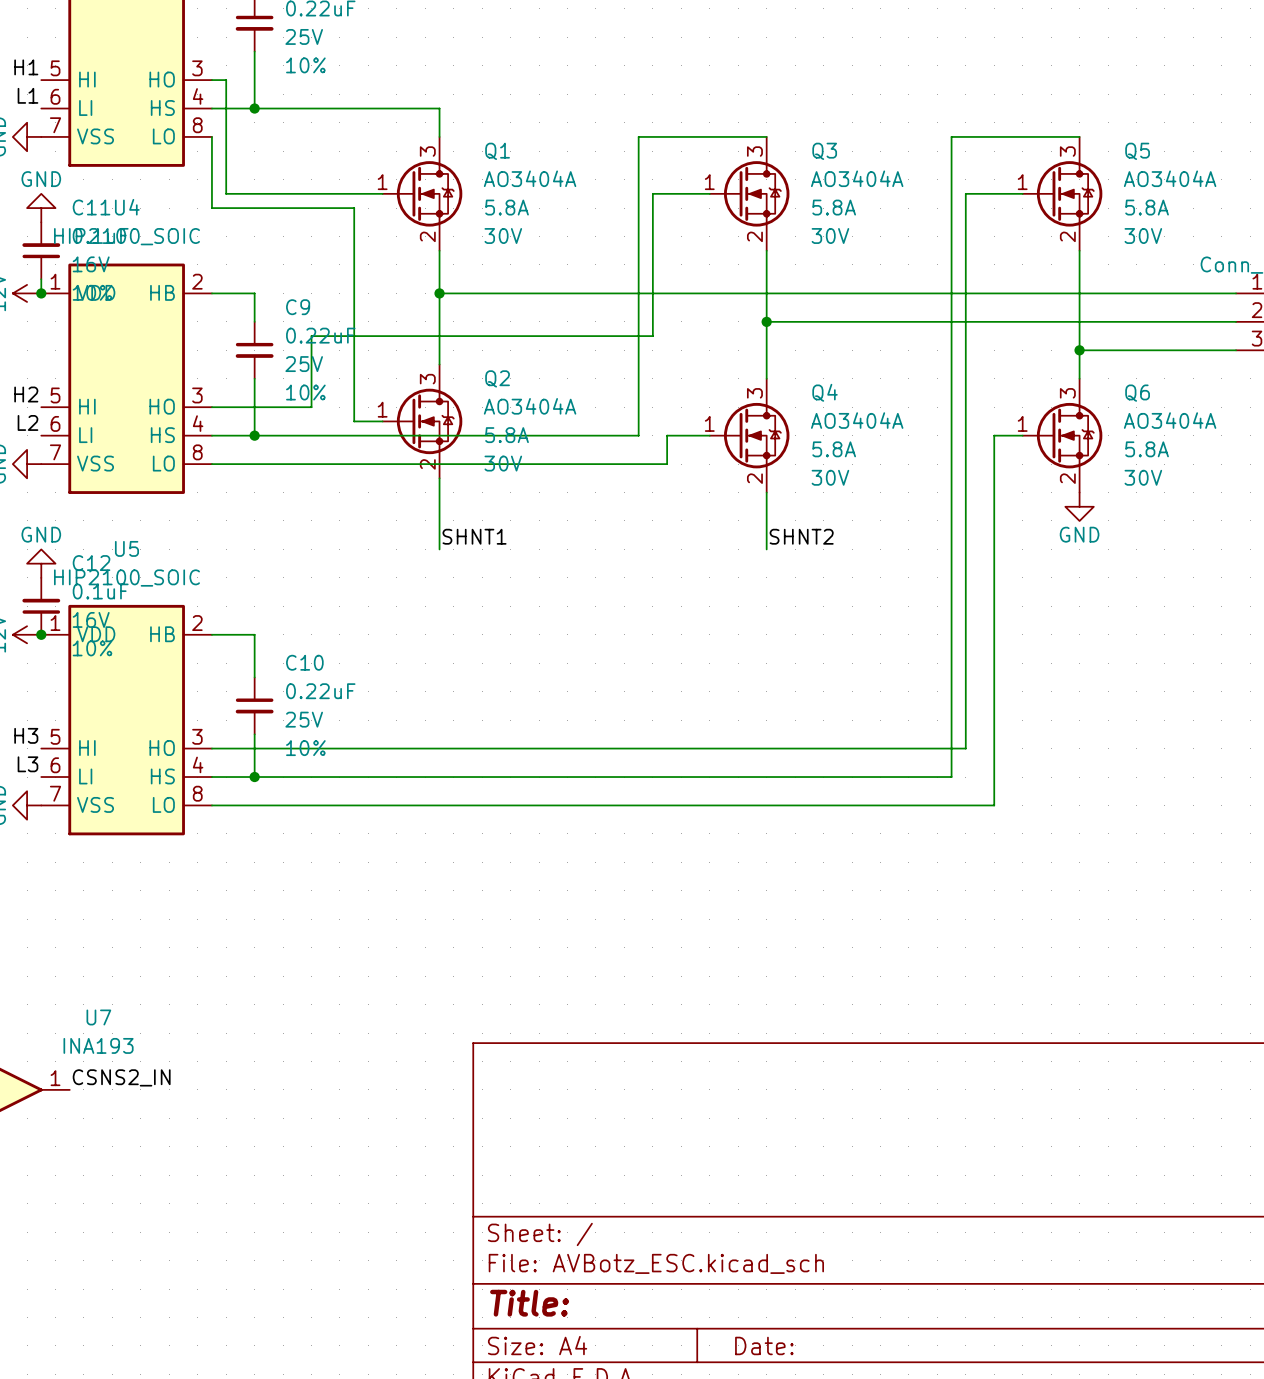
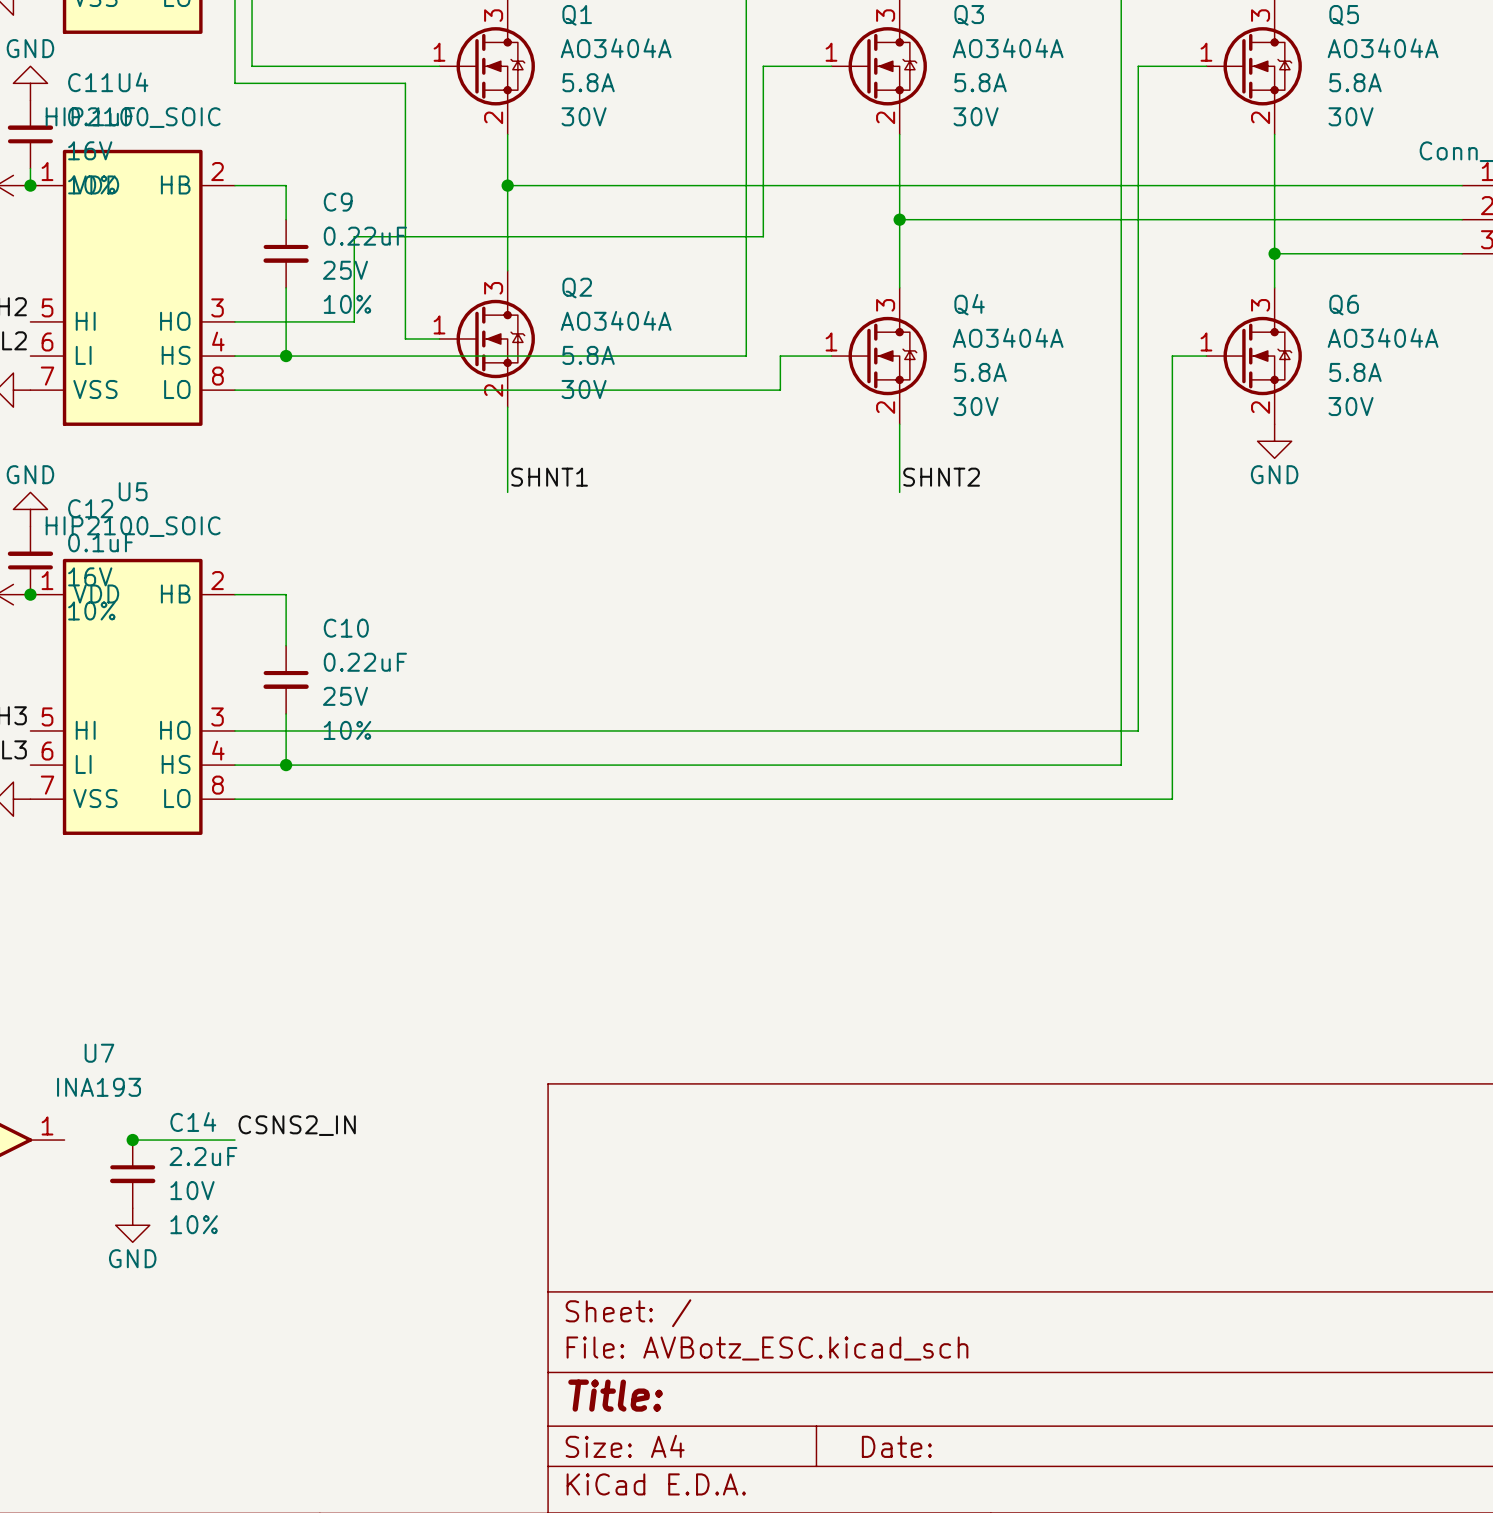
label position: CSNS2_IN (121, 1077) -> CSNS2_IN (297, 1125)
wire: none -> (132, 1140) (234, 1140)
junction: none -> (132, 1140)
C14: none -> 2.2uF (132, 1174)
power symbol: none -> GND (132, 1225)

